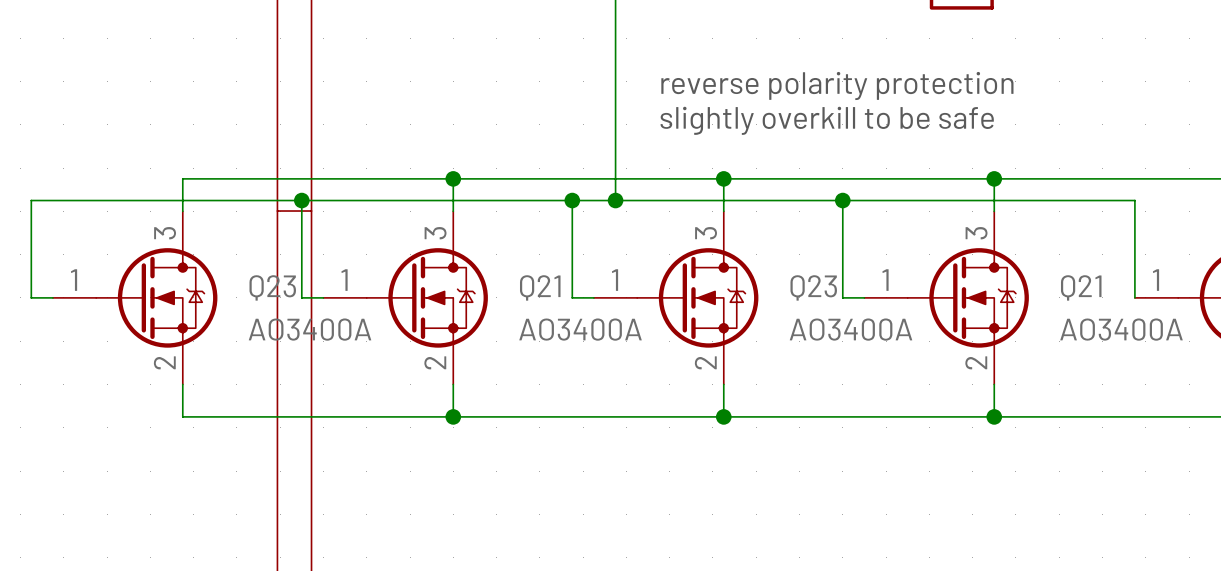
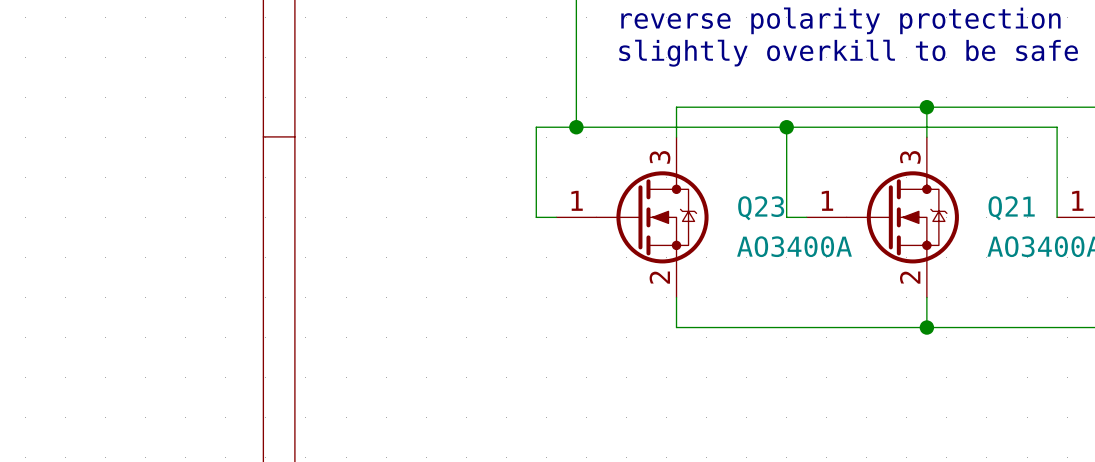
wire: (453, 178) (453, 211) -> none
junction: (453, 178) -> none
wire: (723, 178) (182, 178) (182, 211) -> none
junction: (723, 178) -> none
wire: (301, 200) (301, 297) (323, 297) -> none
junction: (301, 200) -> none
wire: (572, 200) (31, 200) (31, 297) (52, 297) -> none
junction: (572, 200) -> none
Q23: AO3400A (135, 297) -> none
Q21: AO3400A (405, 297) -> none
wire: (182, 384) (182, 416) (723, 416) -> none
wire: (453, 384) (453, 416) -> none
junction: (453, 416) -> none
junction: (723, 416) -> none

